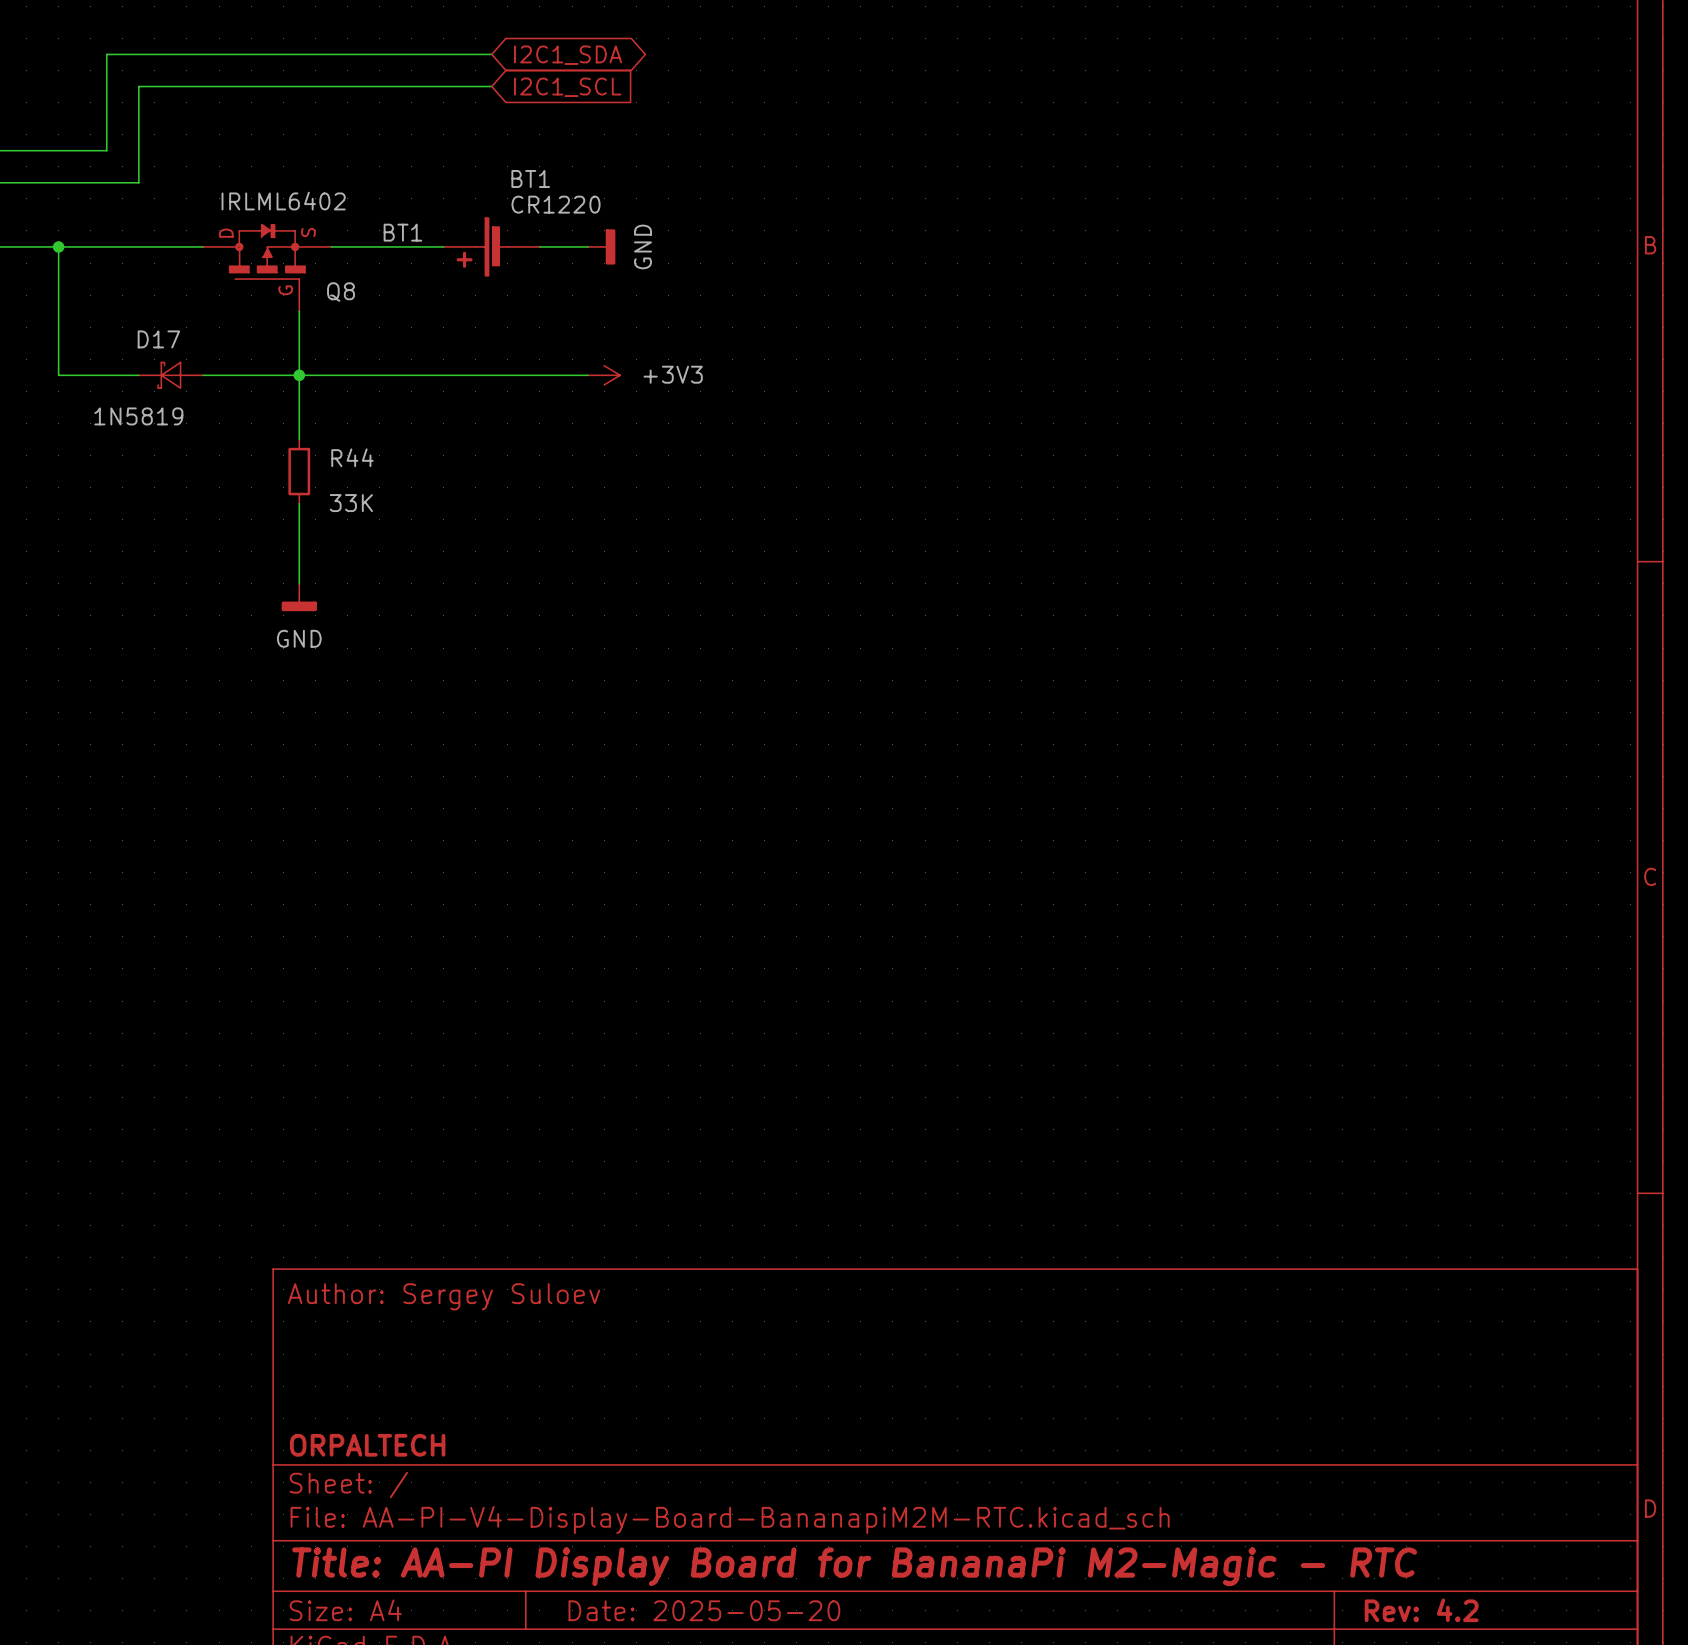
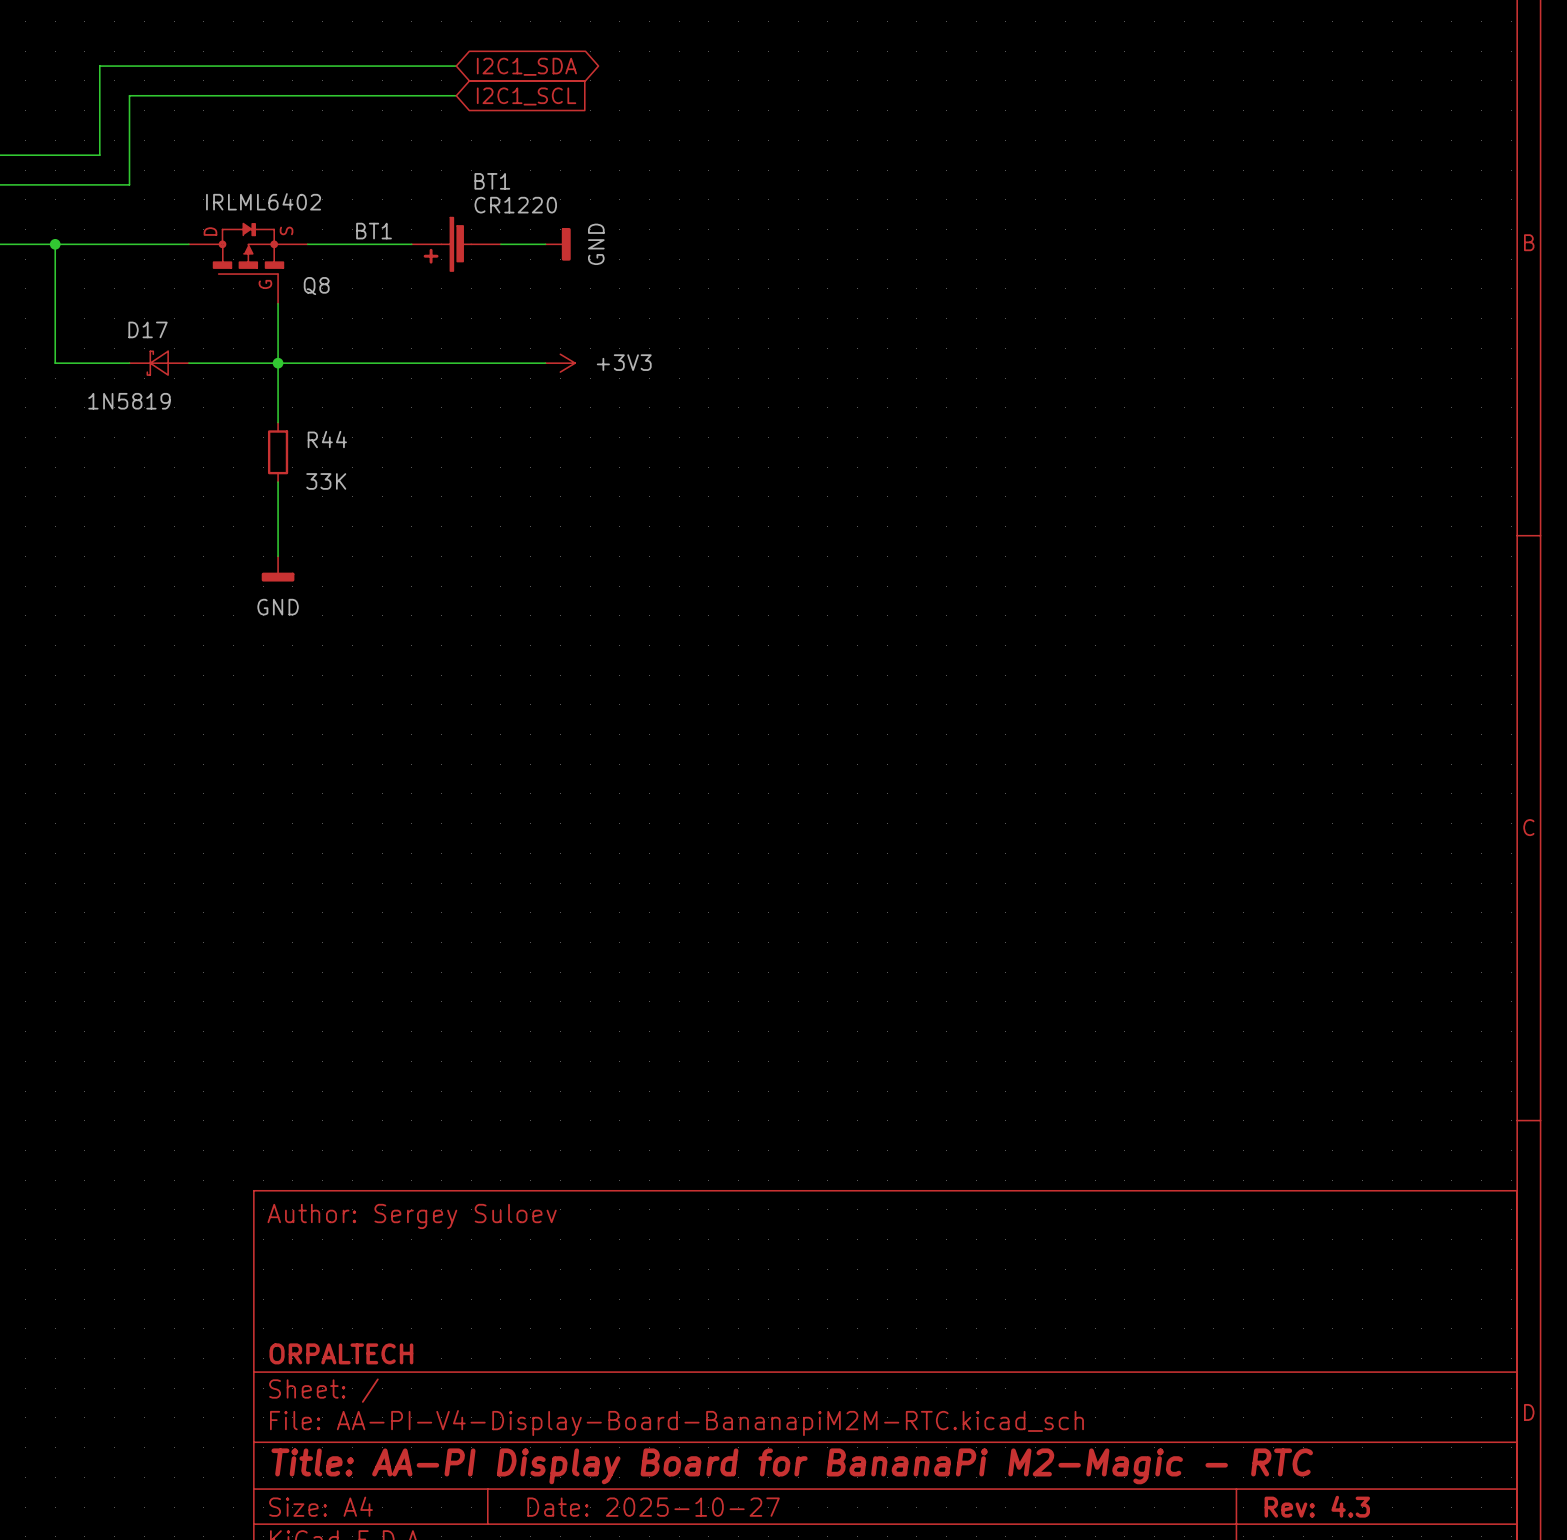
title block: Date: 2025-05-20 (704, 1610) -> Date: 2025-10-27 (653, 1507)
title block: Rev: 4.2 (1421, 1610) -> Rev: 4.3 (1317, 1506)

